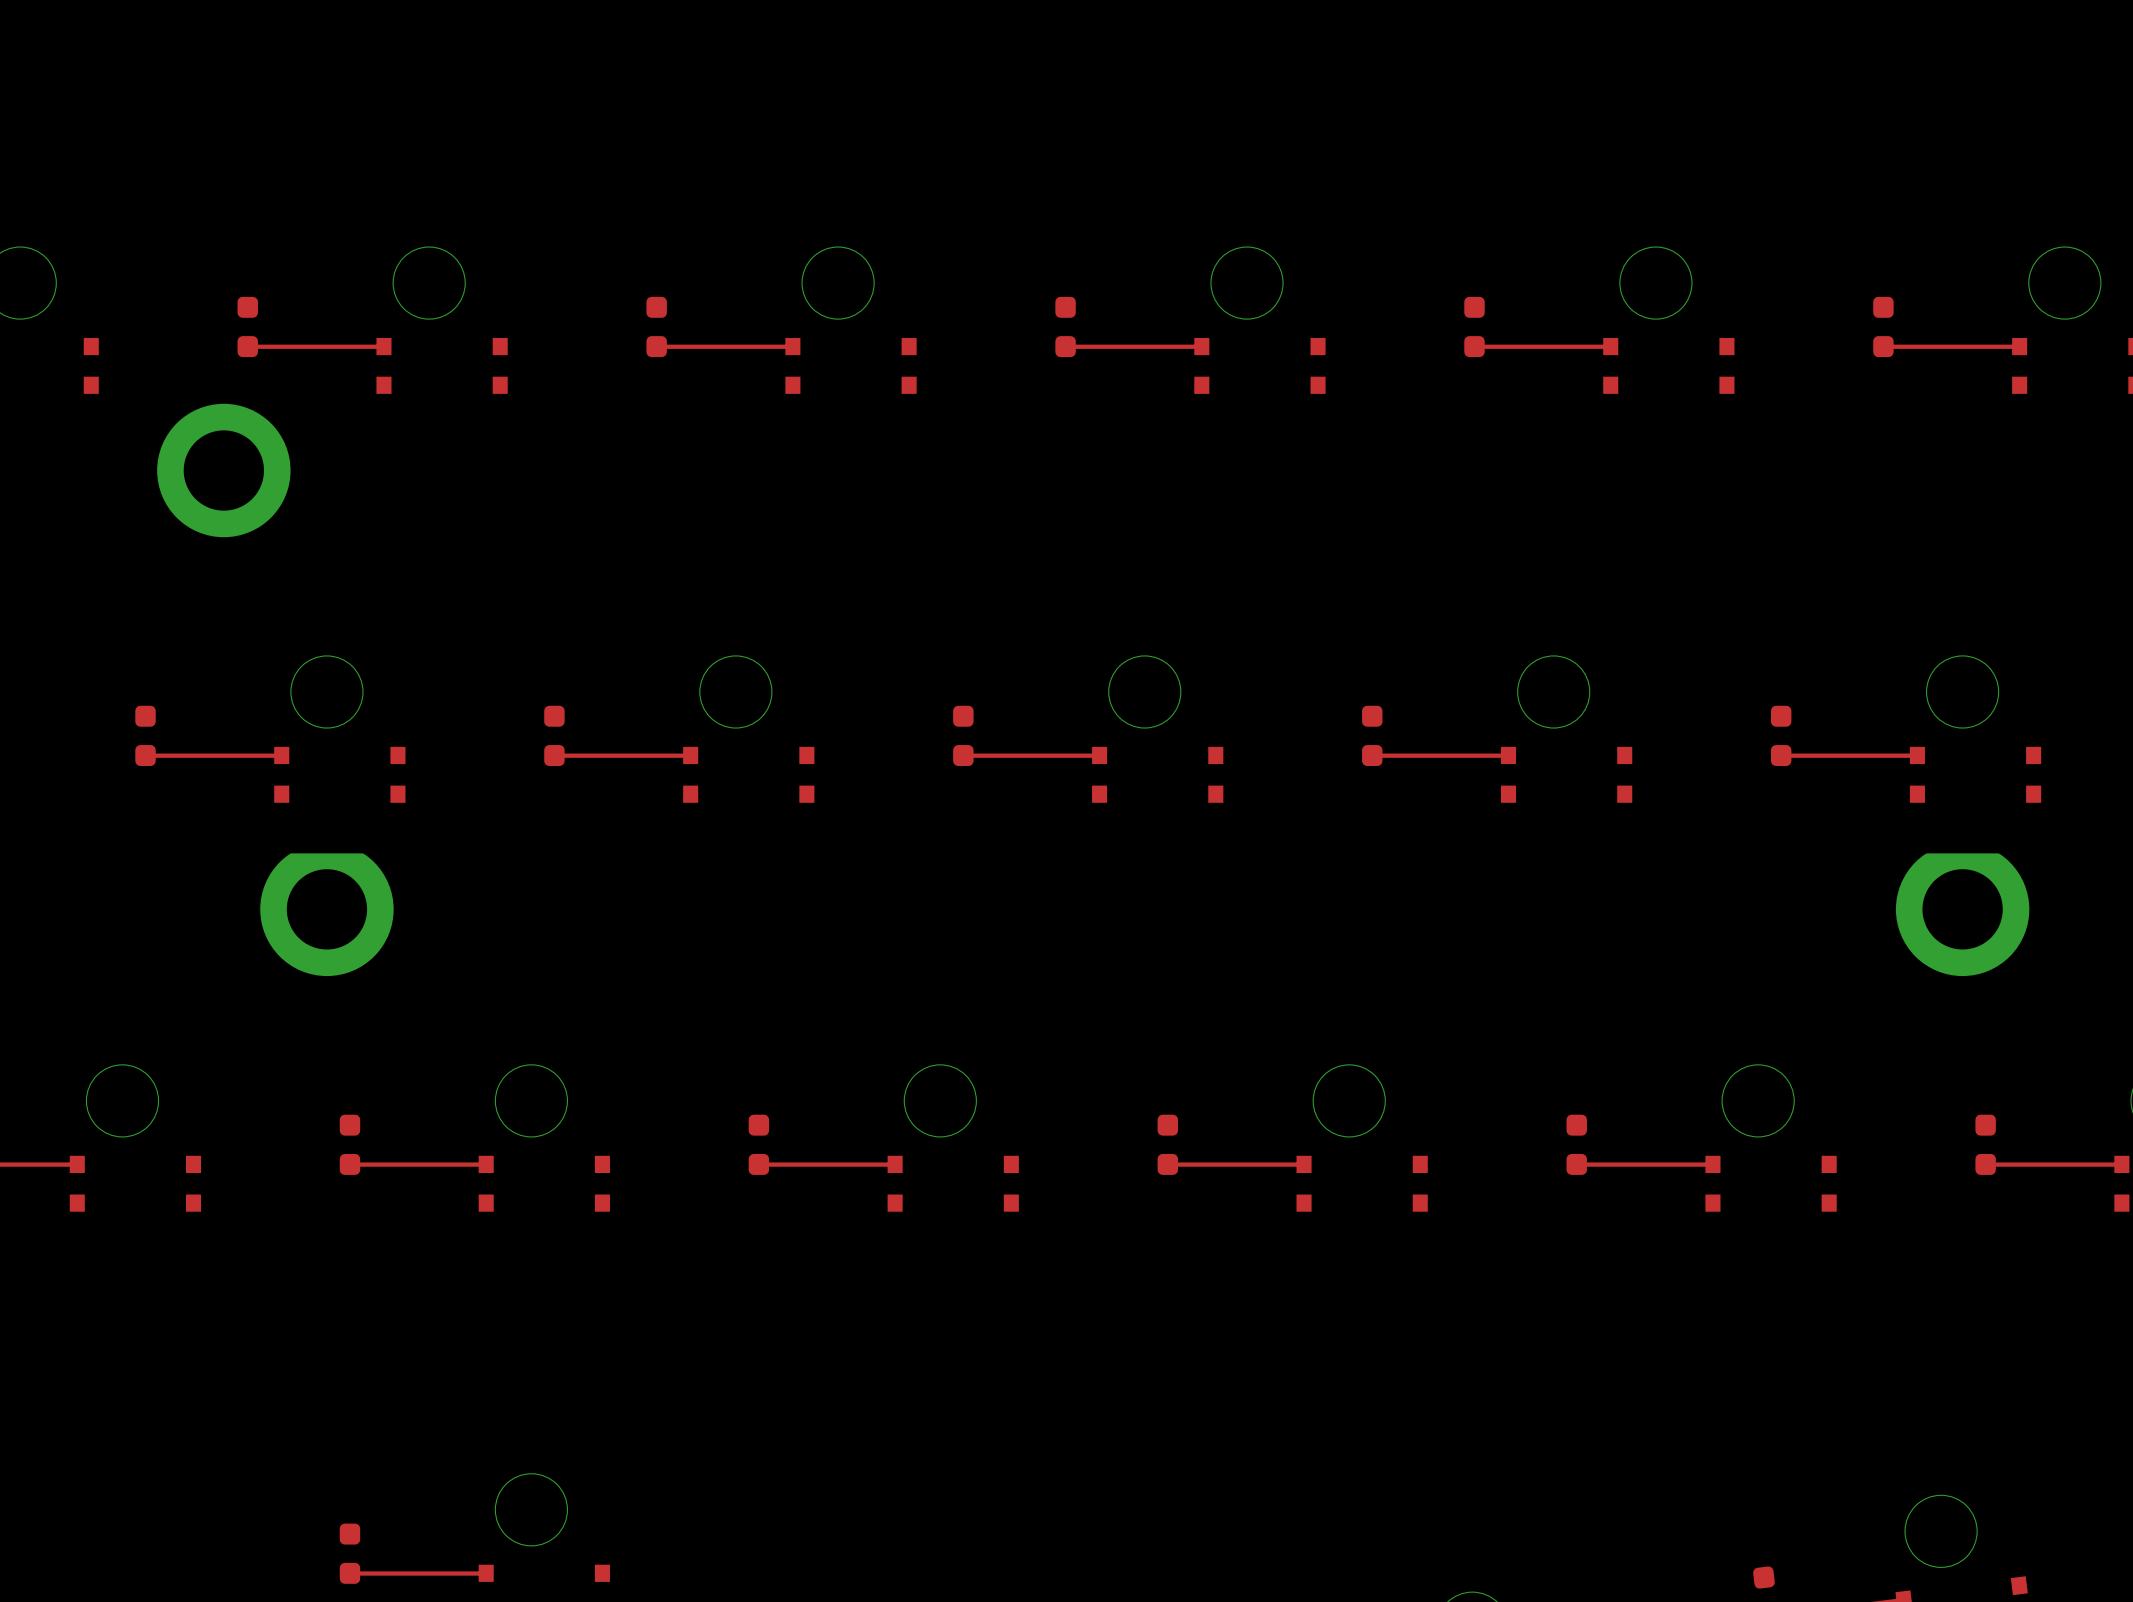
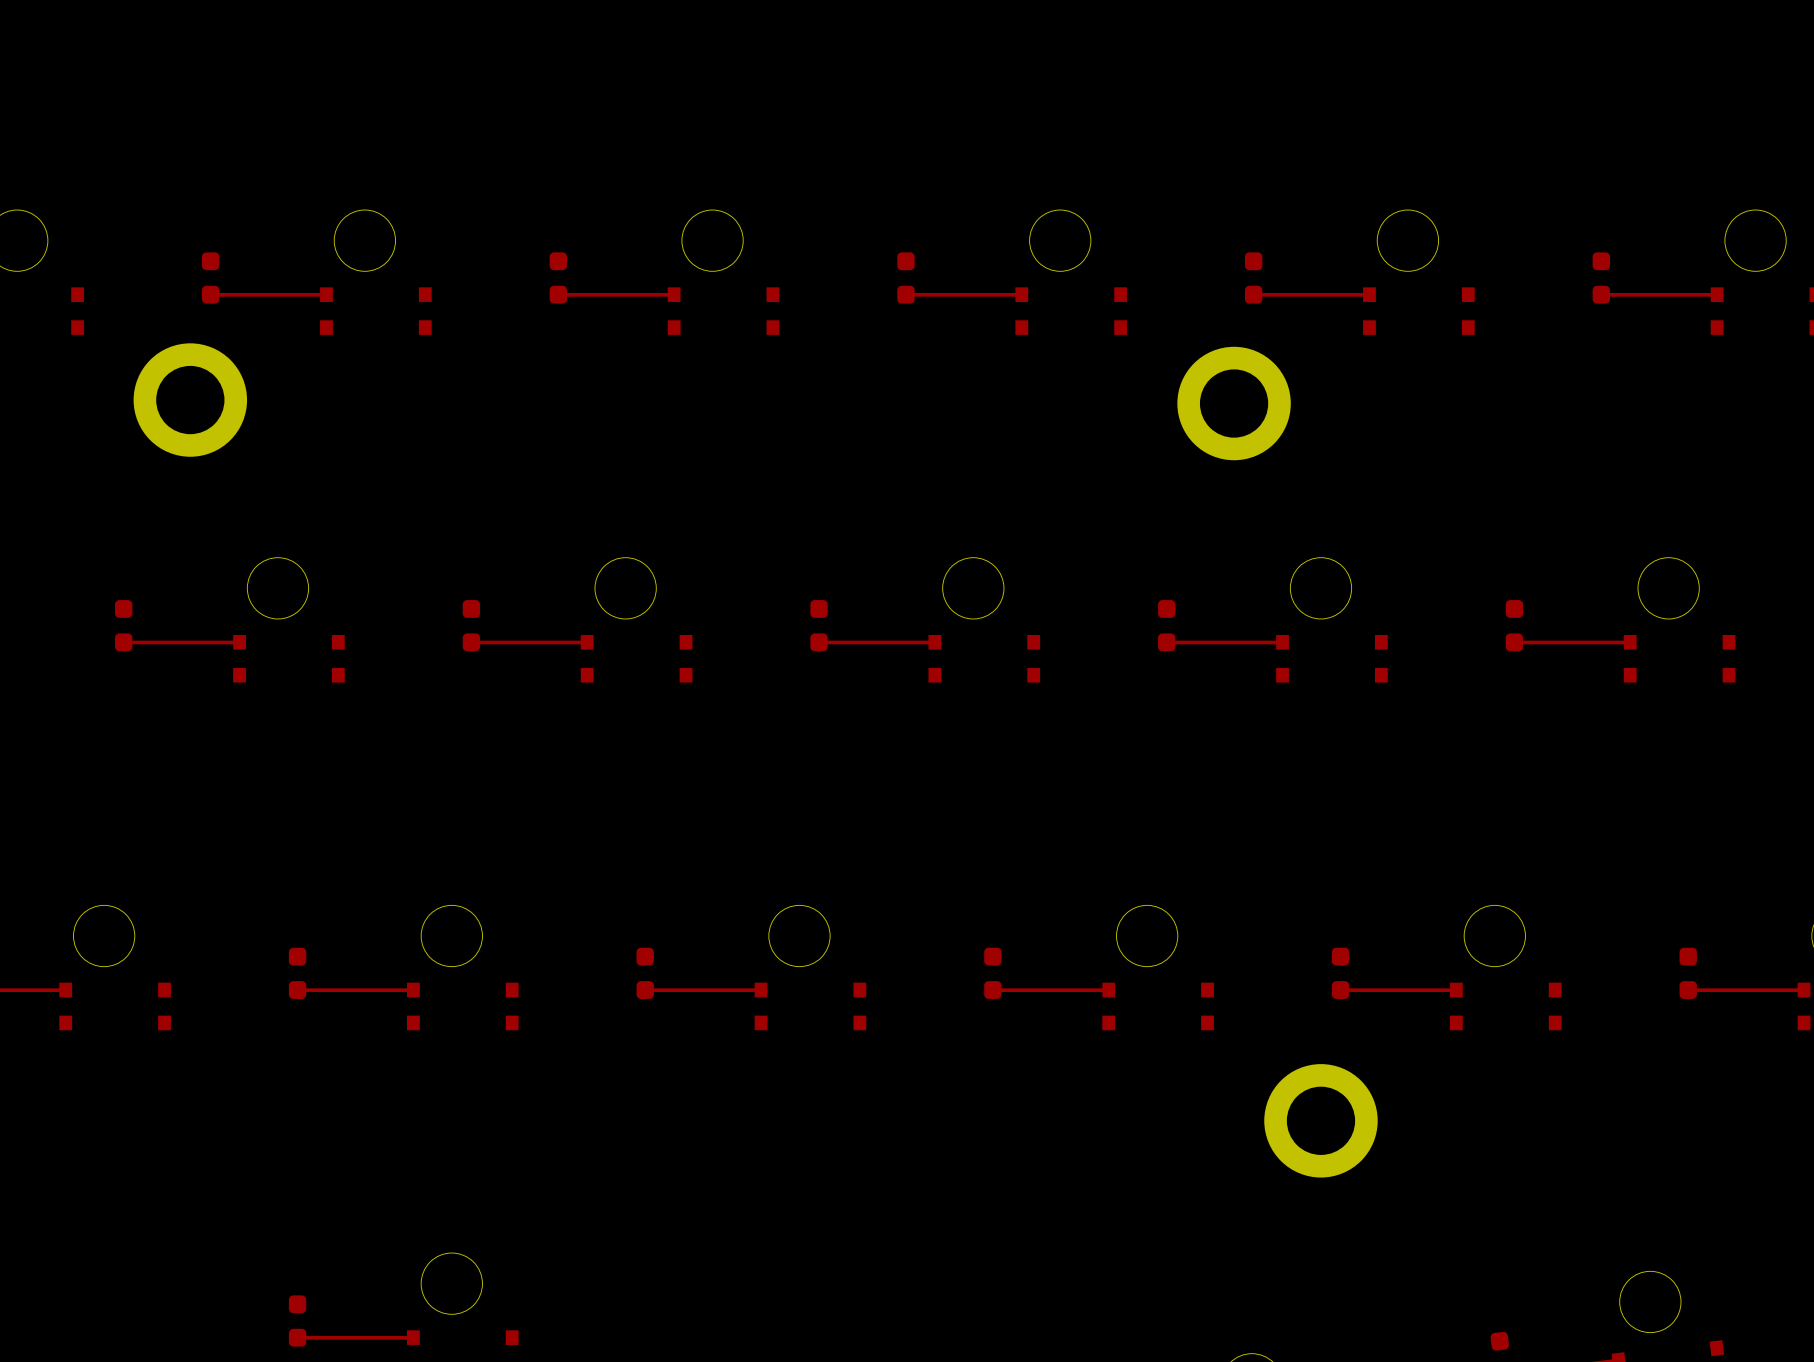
part: none -> (1234, 403)
part: (326, 909) -> none
part: (1962, 909) -> none
part: none -> (1320, 1120)

